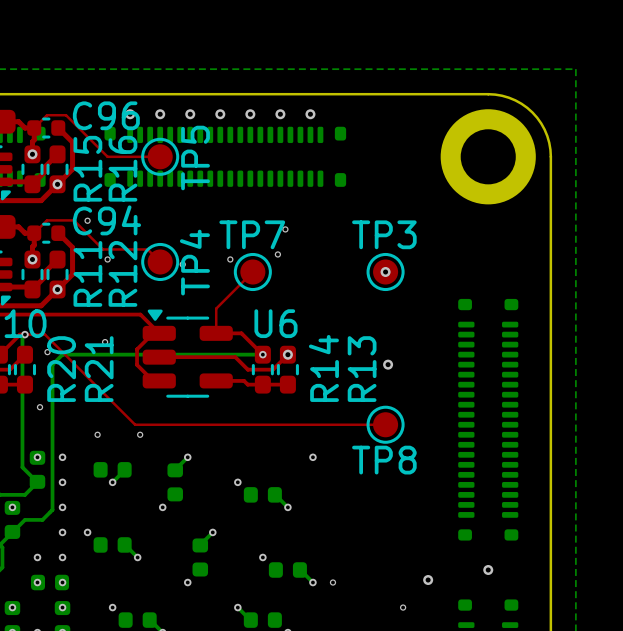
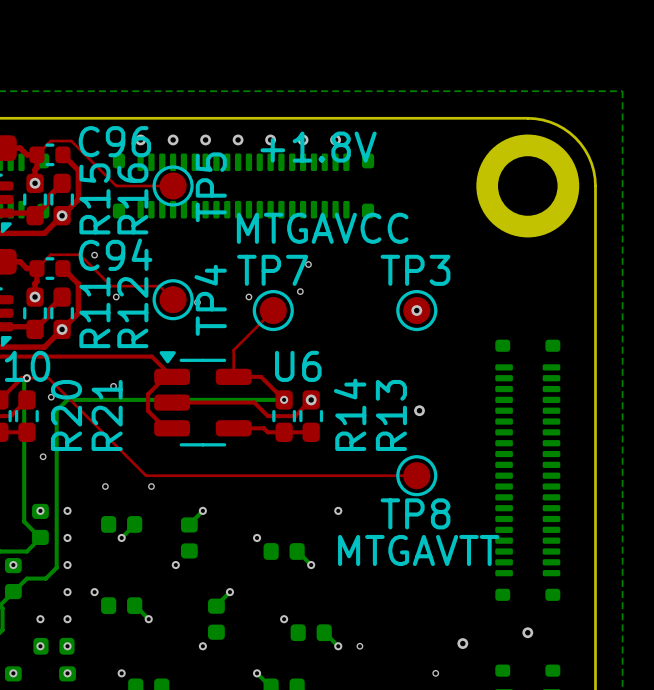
text: none -> +1.8V (318, 147)
text: none -> MTGAVCC (322, 228)
text: none -> MTGAVTT (418, 550)

